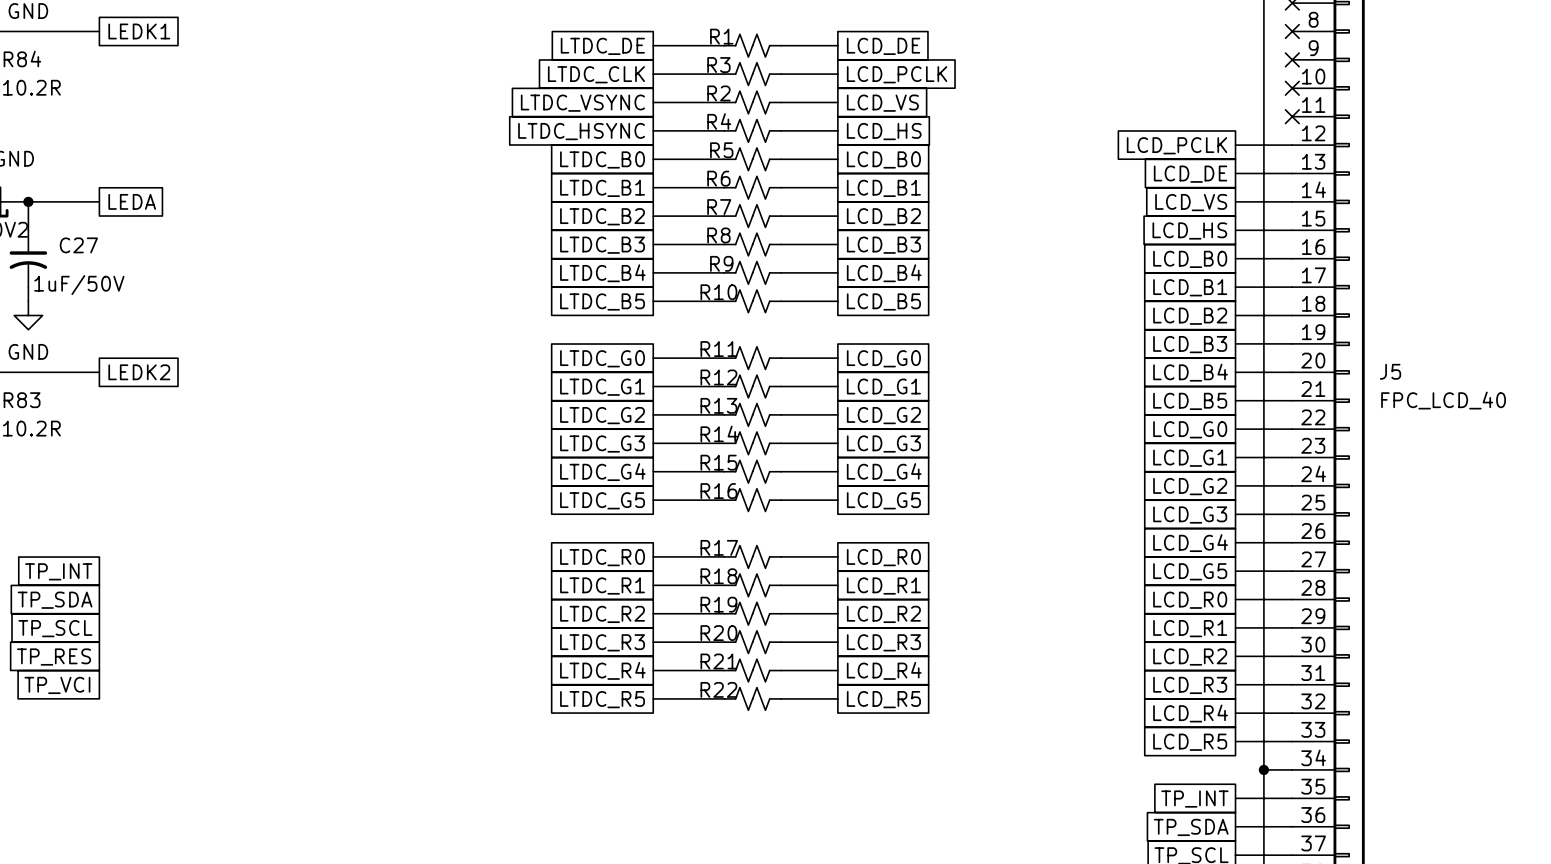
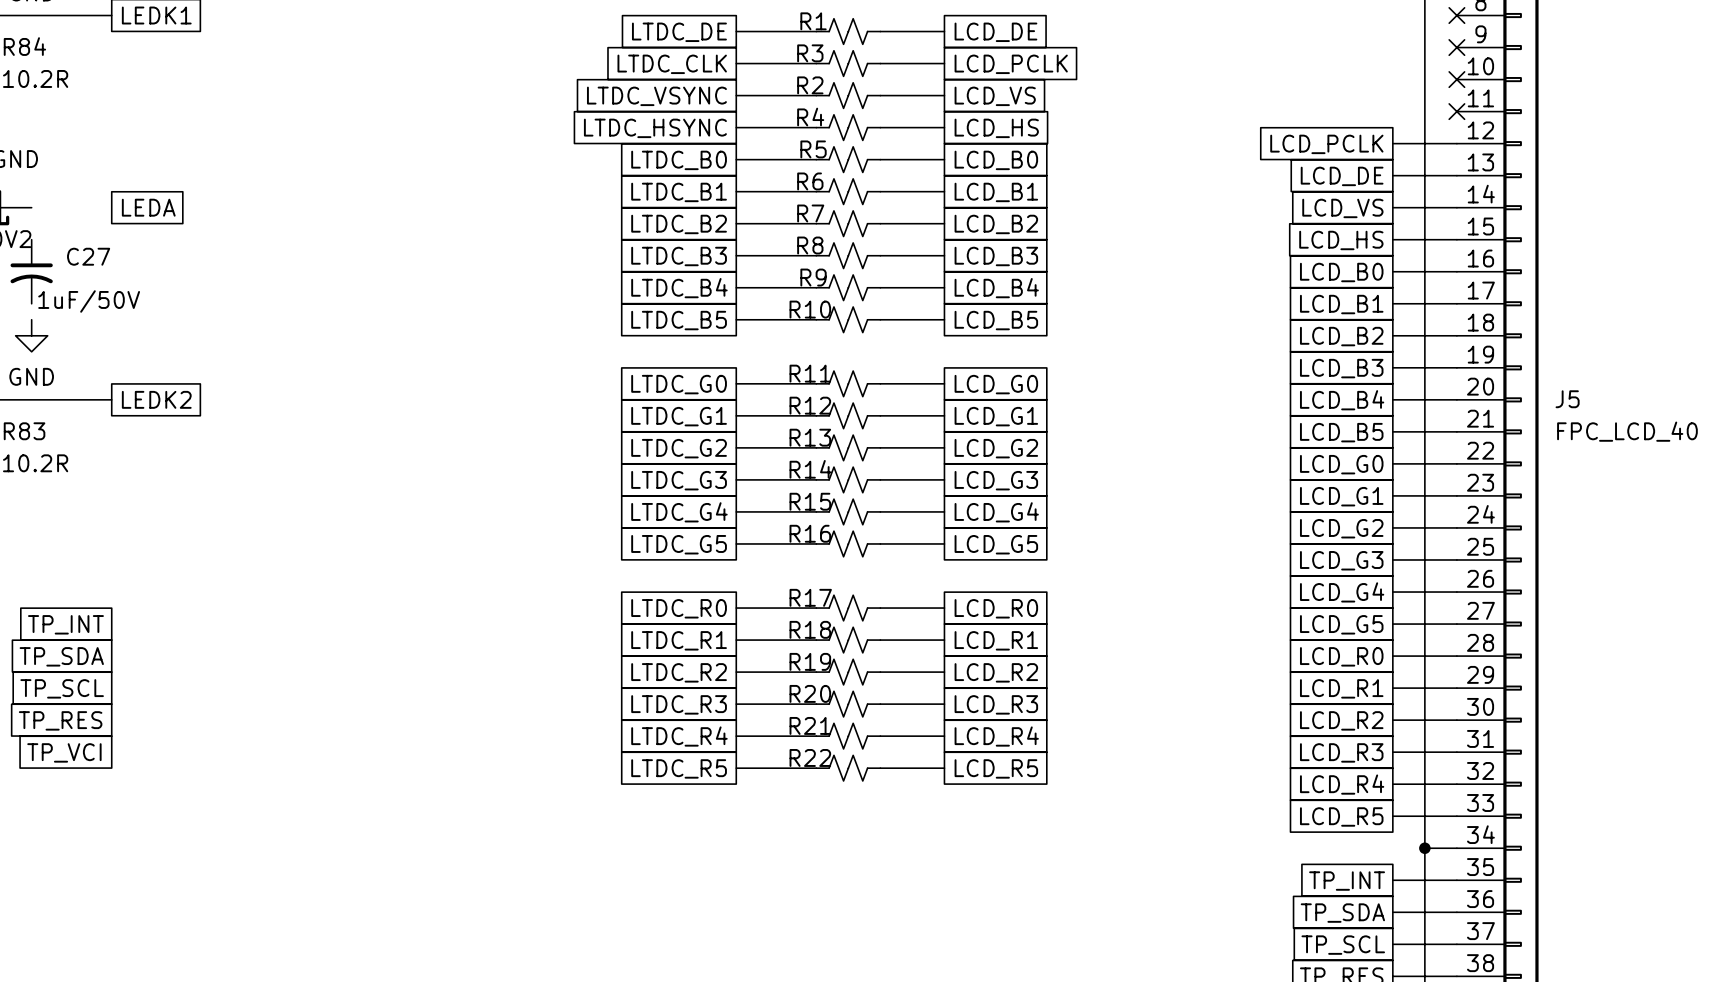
junction: (28, 201) -> none
wire: (99, 201) (28, 201) (28, 230) -> none
wire: (28, 287) (28, 301) -> none

